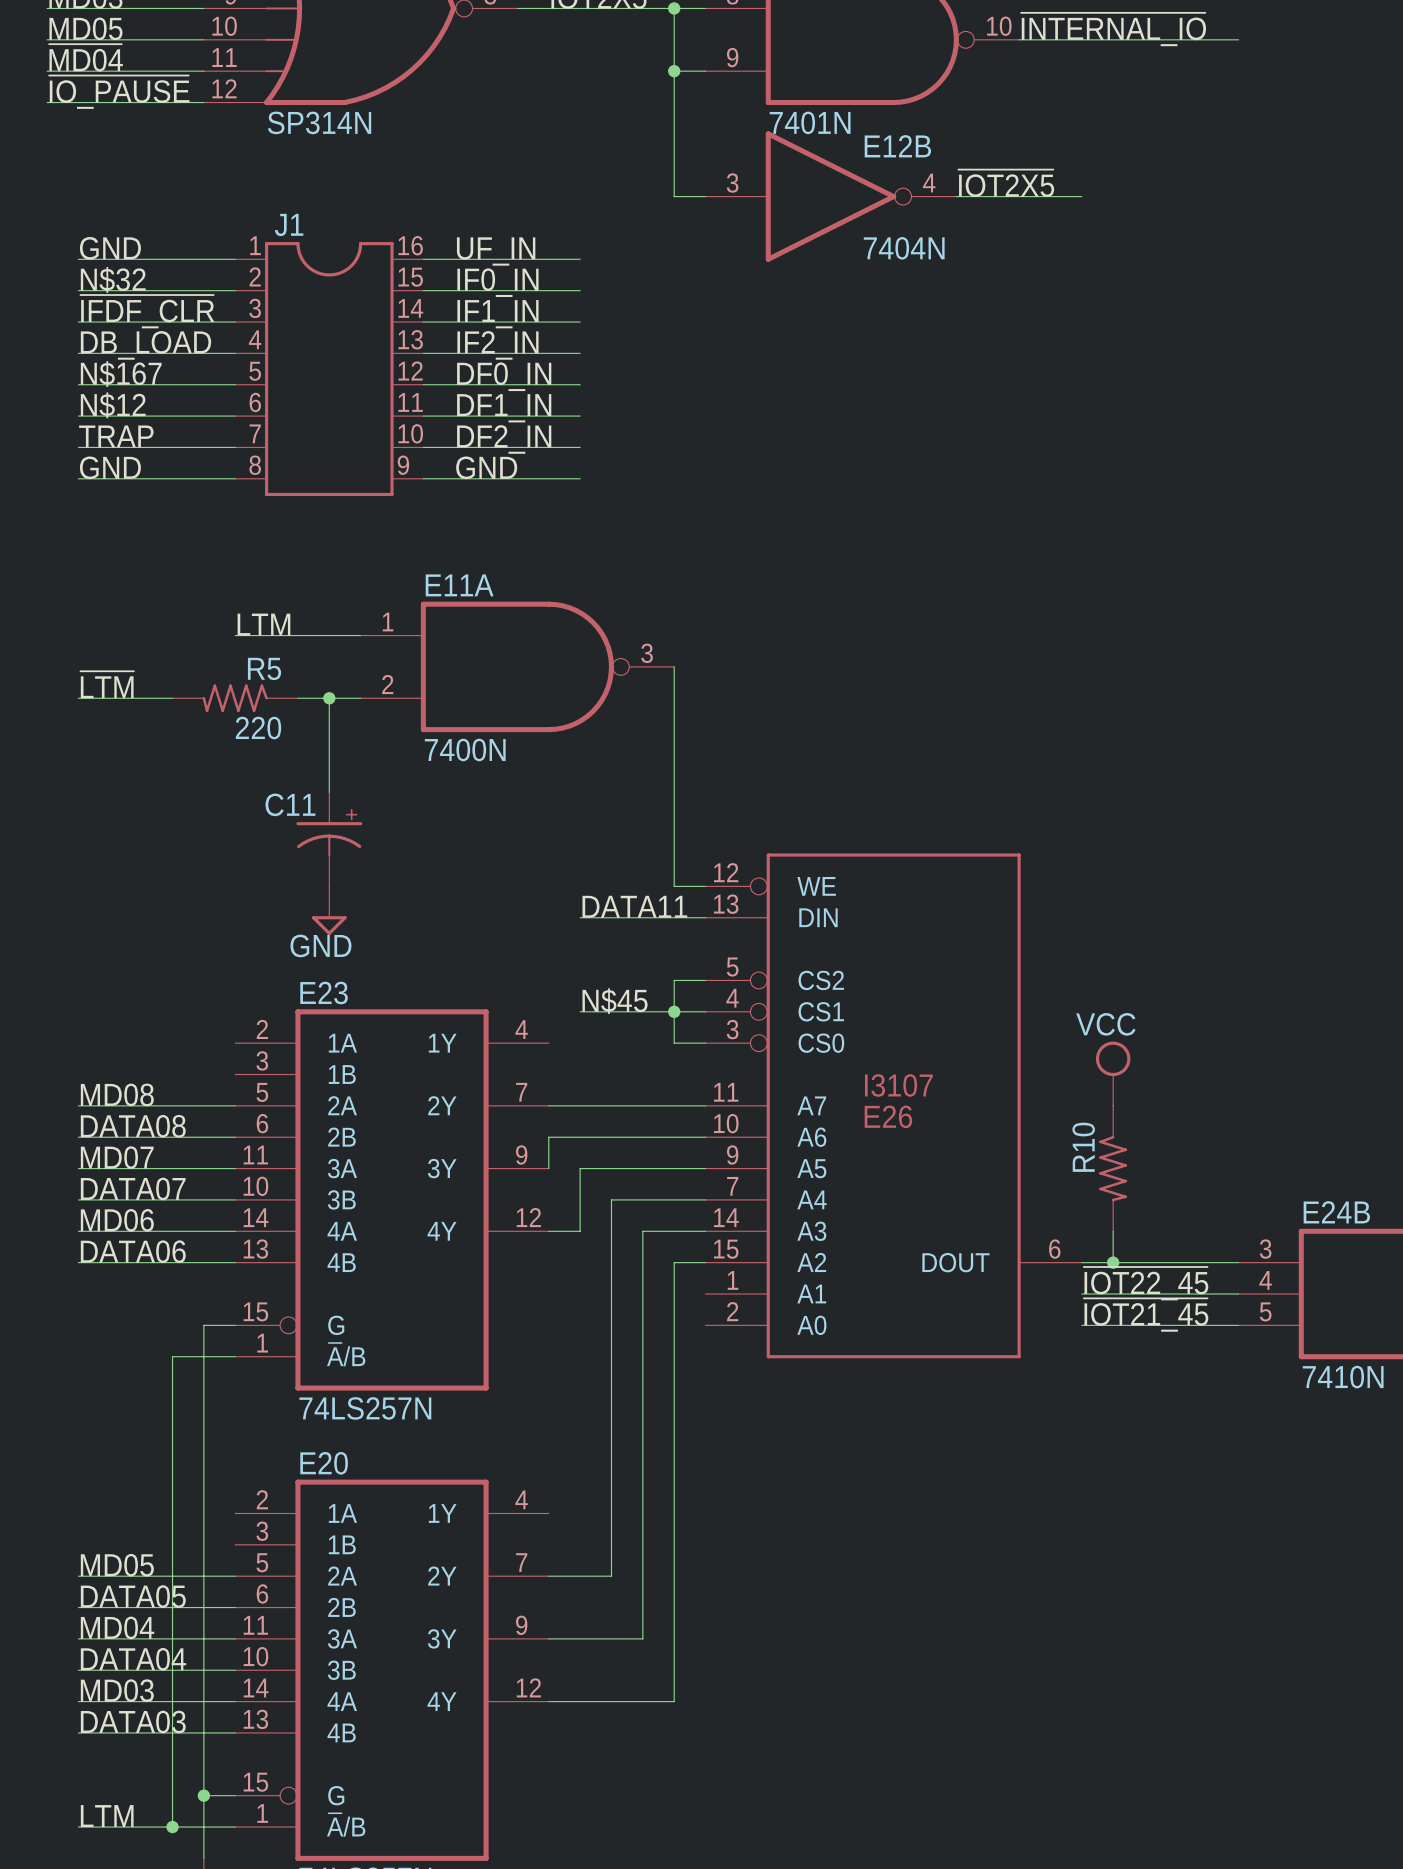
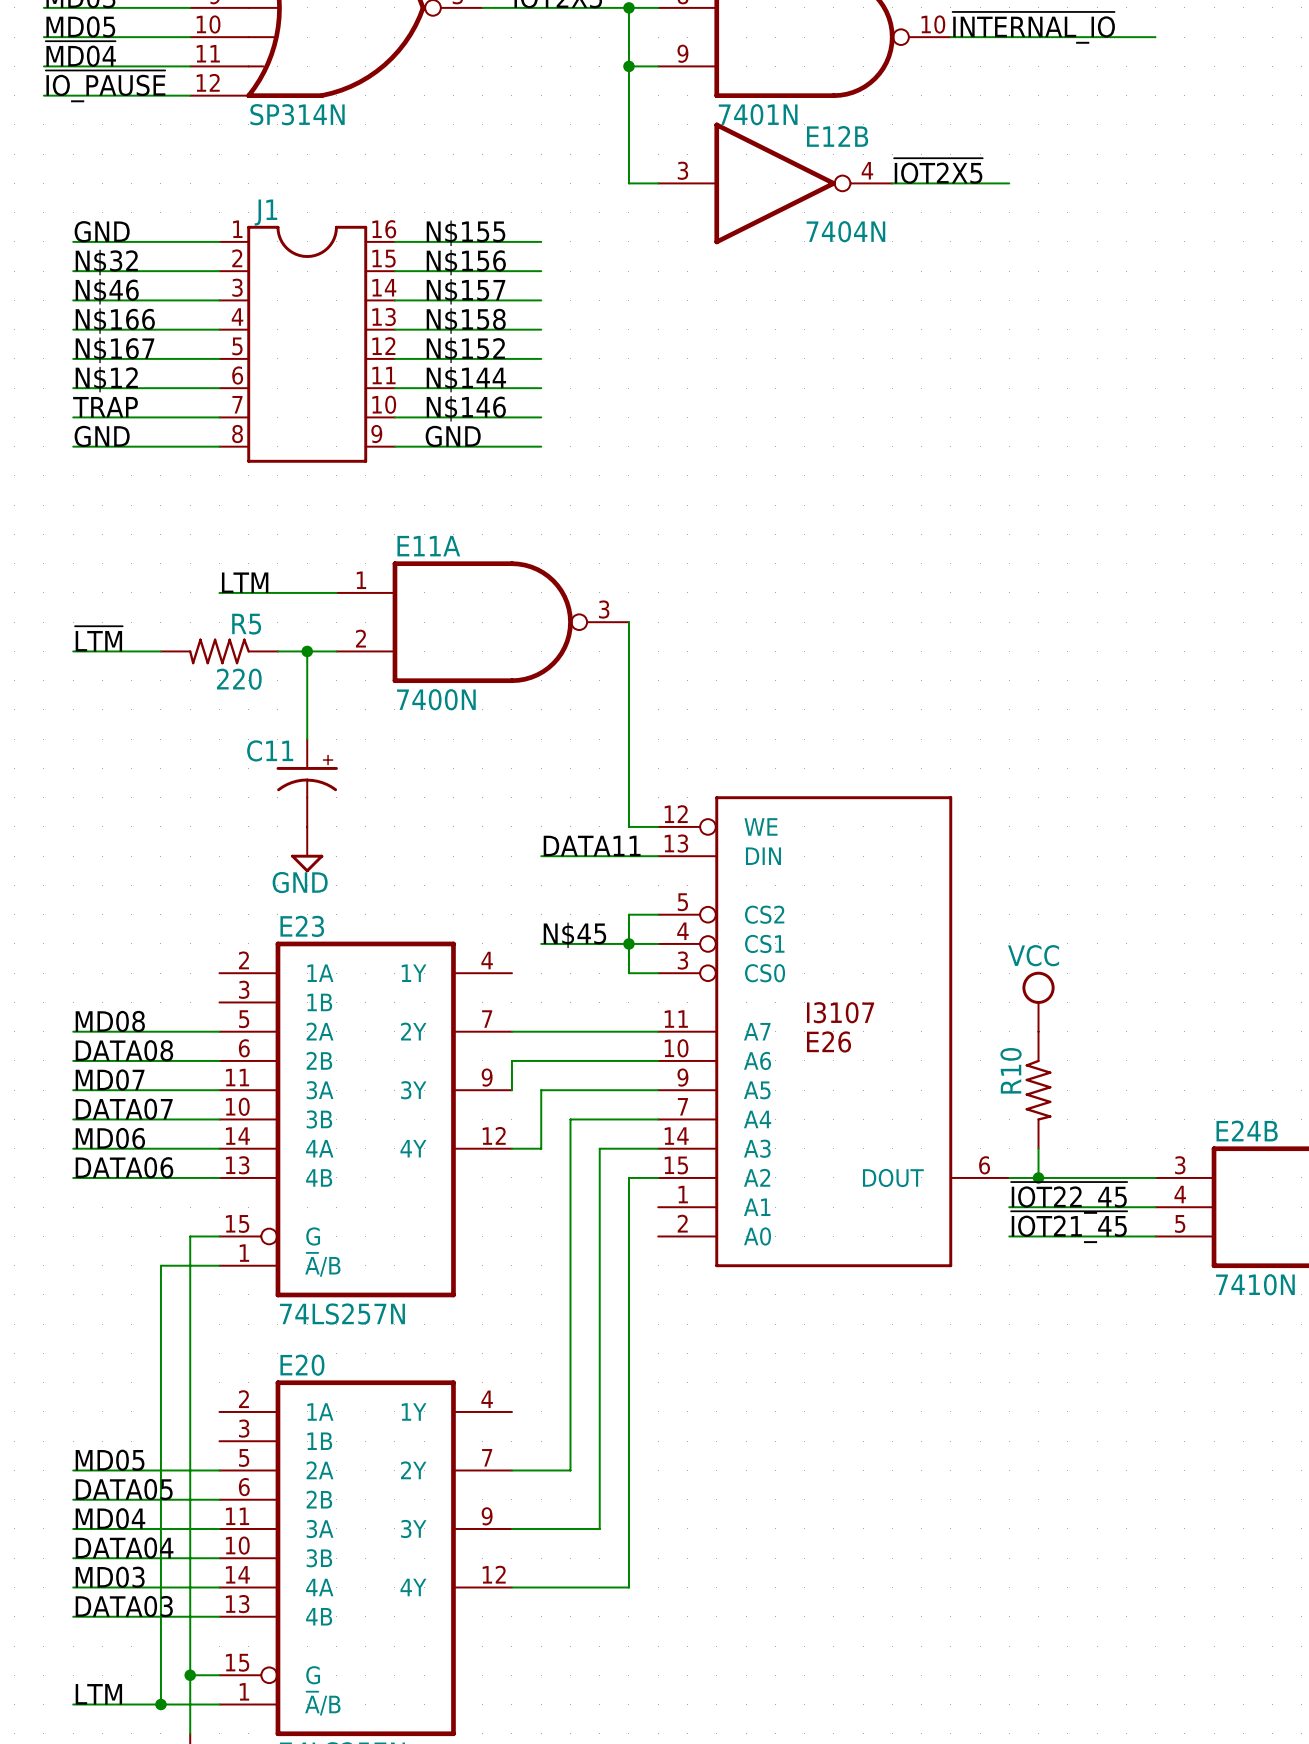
label: UF_IN (496, 251) -> N$155 (465, 233)
label: IF0_IN (497, 282) -> N$156 (466, 262)
label: ~{IFDF_CLR} (147, 311) -> N$46 (107, 291)
label: IF1_IN (497, 314) -> N$157 (466, 291)
label: DB_LOAD (145, 345) -> N$166 (115, 321)
label: IF2_IN (497, 345) -> N$158 (466, 321)
label: DF0_IN (504, 376) -> N$152 (465, 350)
label: DF1_IN (504, 408) -> N$144 (466, 379)
label: DF2_IN (504, 439) -> N$146 (466, 408)

